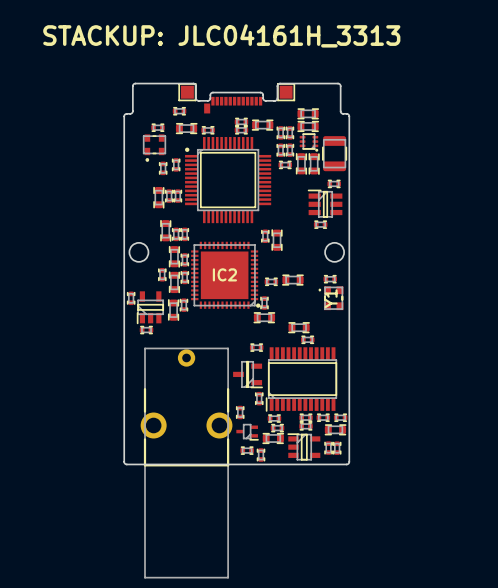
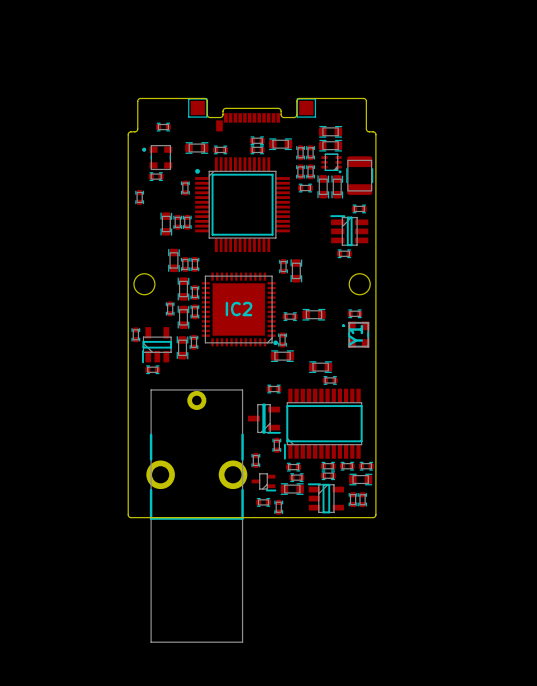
text: STACKUP: JLC04161H_3313 (221, 35) -> none
part: none -> (163, 127)
part: (179, 111) -> none
part: (157, 127) -> none
part rotation: 0° (154, 148) -> 90° clockwise (157, 157)
part: none -> (156, 176)
part: (163, 168) -> none
part: none -> (139, 197)

